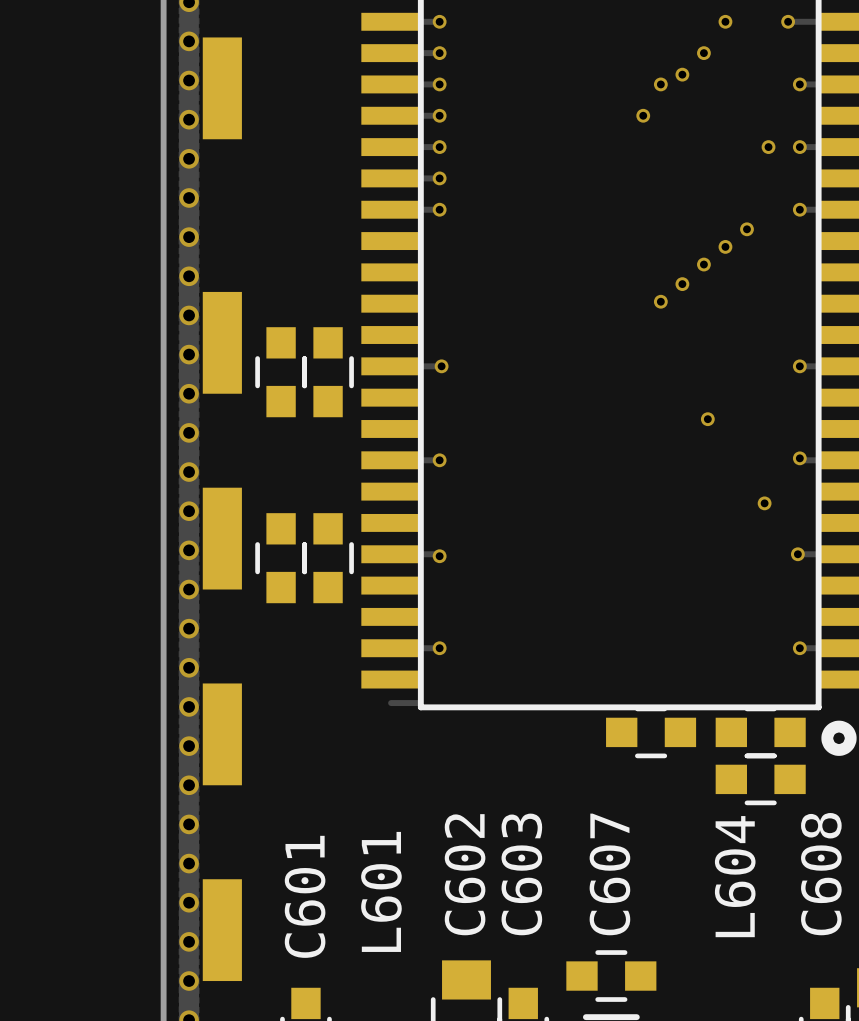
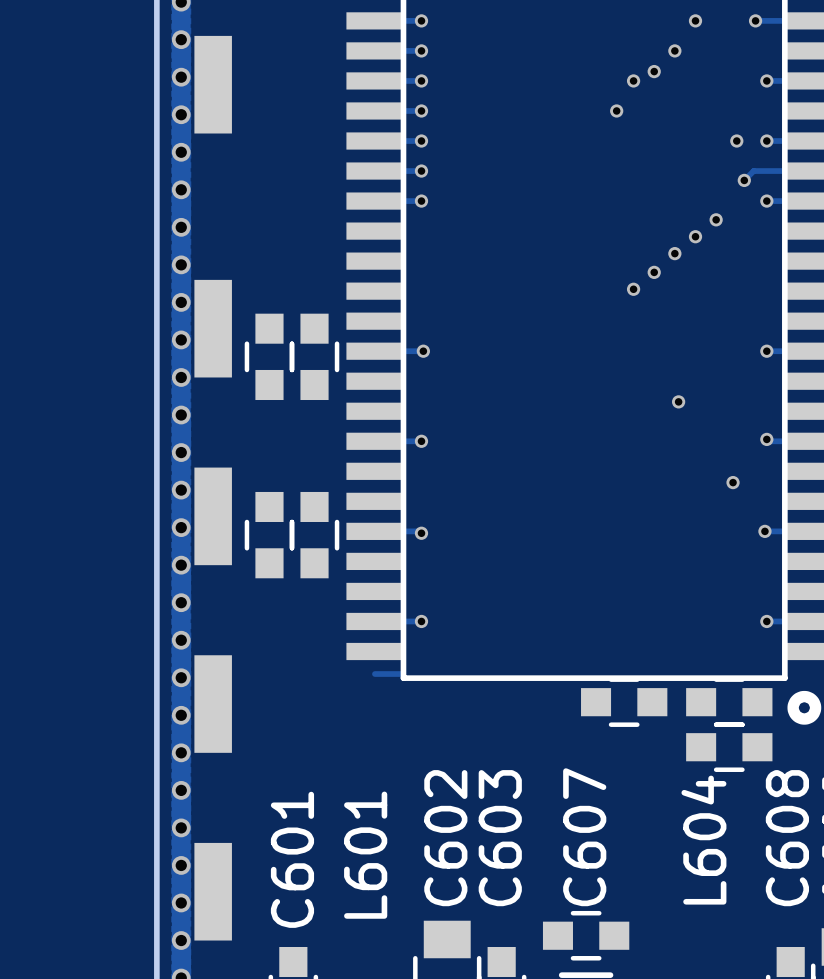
track: none -> (813, 171) (753, 171) (744, 180)
via: none -> (744, 180)

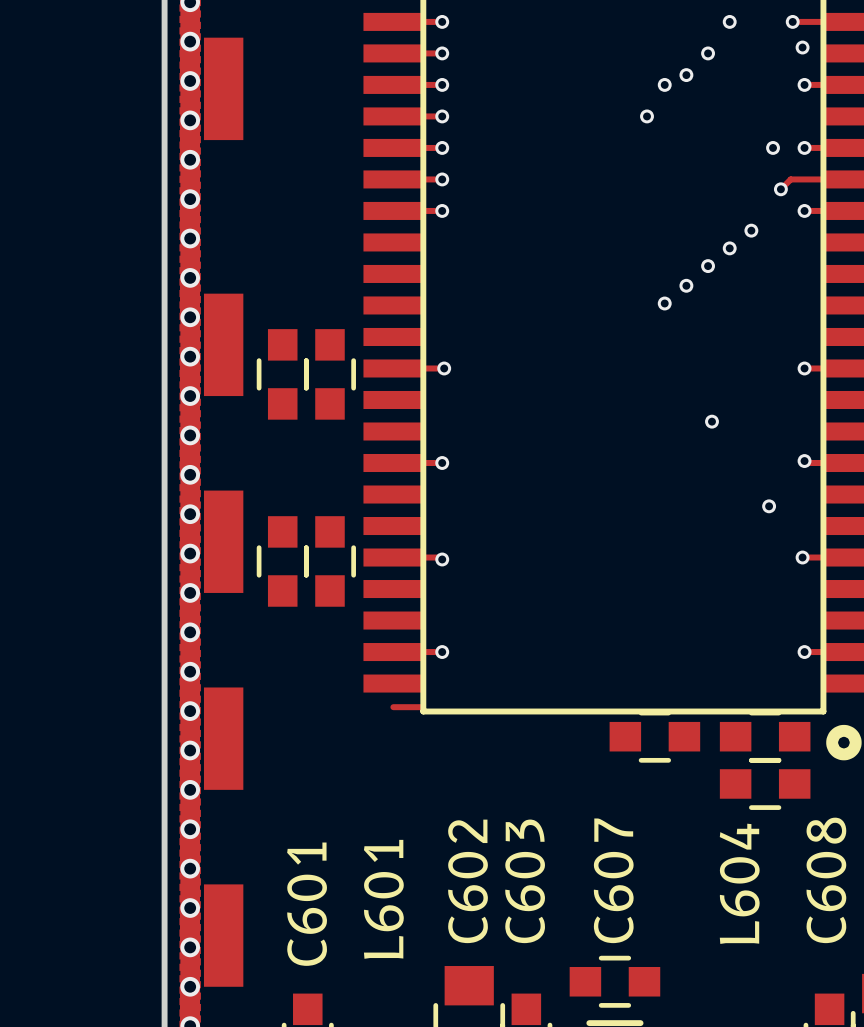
via: none -> (802, 47)

